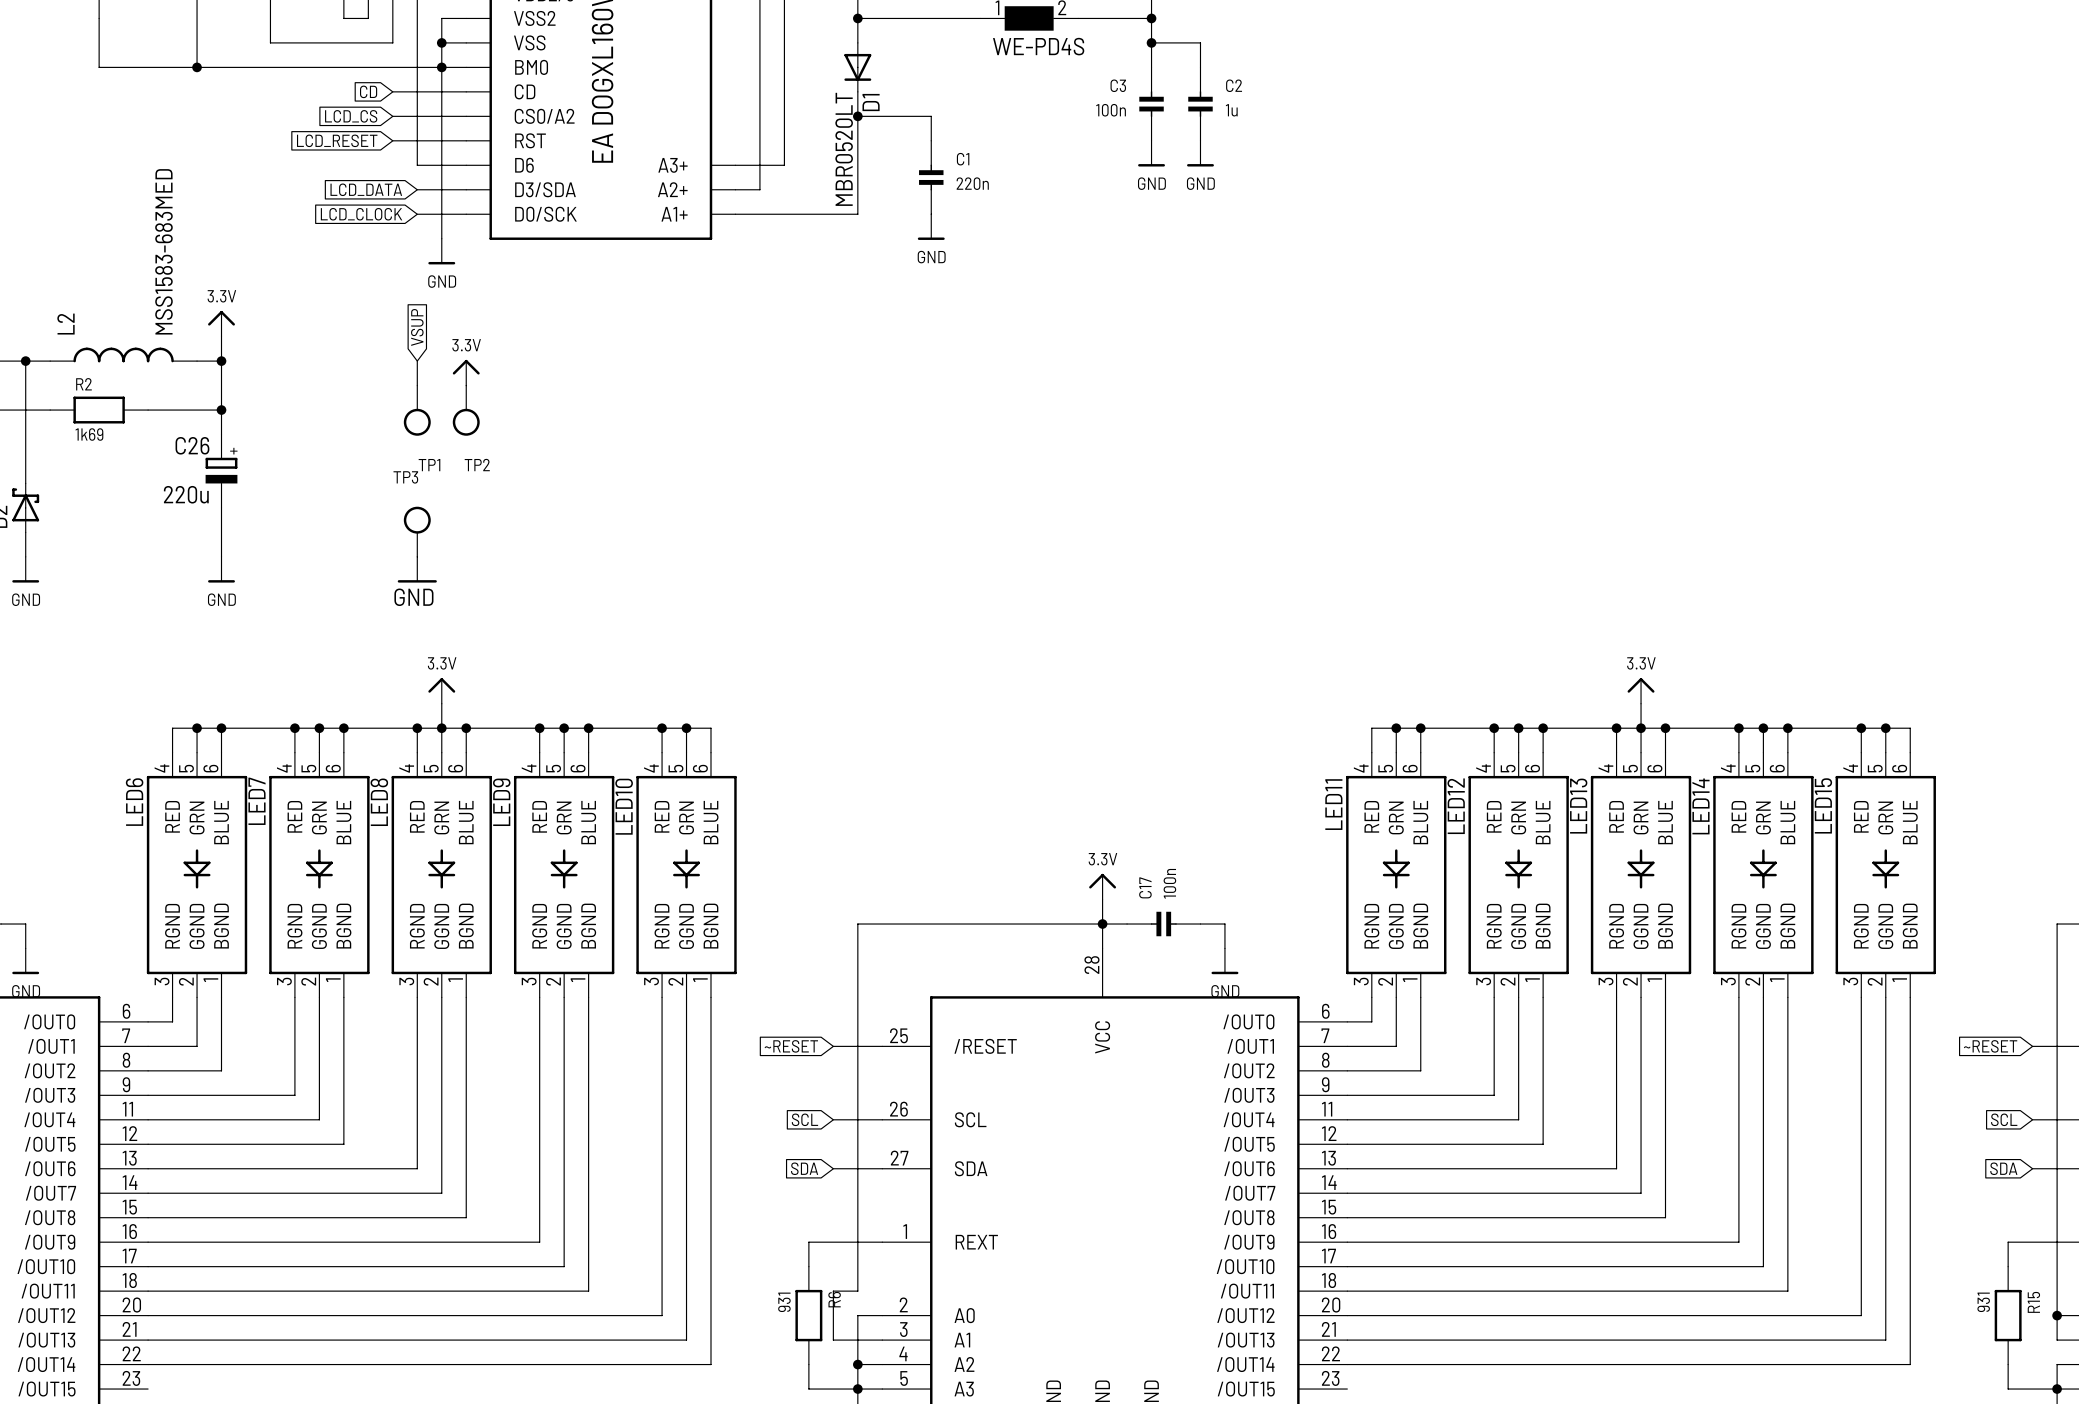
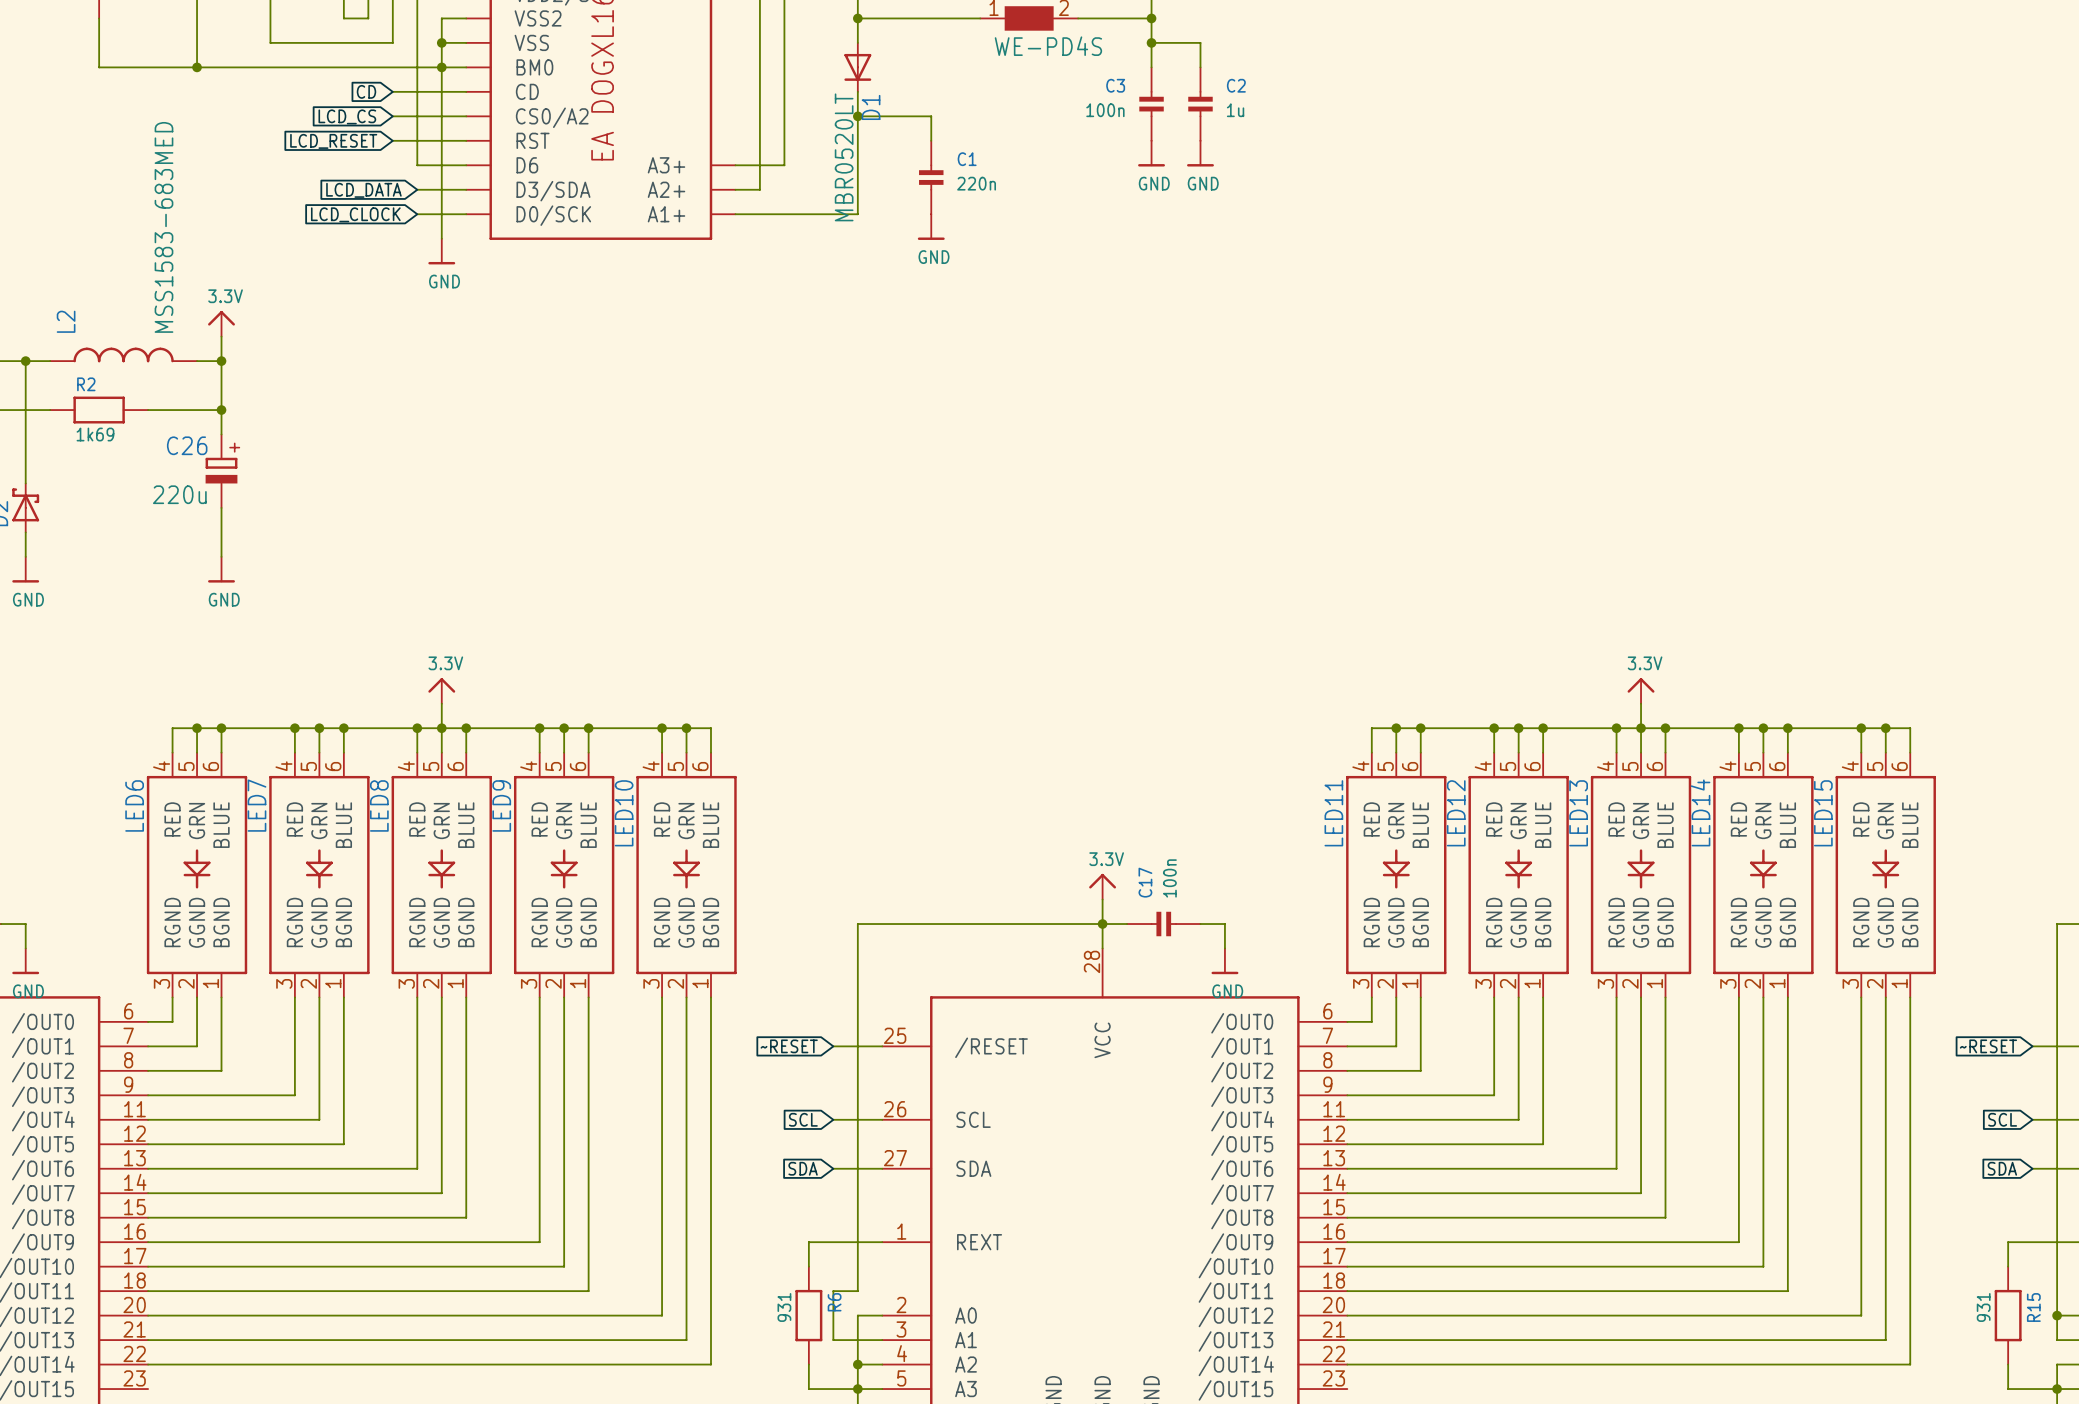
global label: VSUP (417, 327) -> none
wire: (417, 361) (417, 385) -> none
power symbol: 3.3V (466, 372) -> none
TP1: (417, 410) -> none
TP2: (466, 410) -> none
TP3: (417, 531) -> none
power symbol: GND (417, 569) -> none

